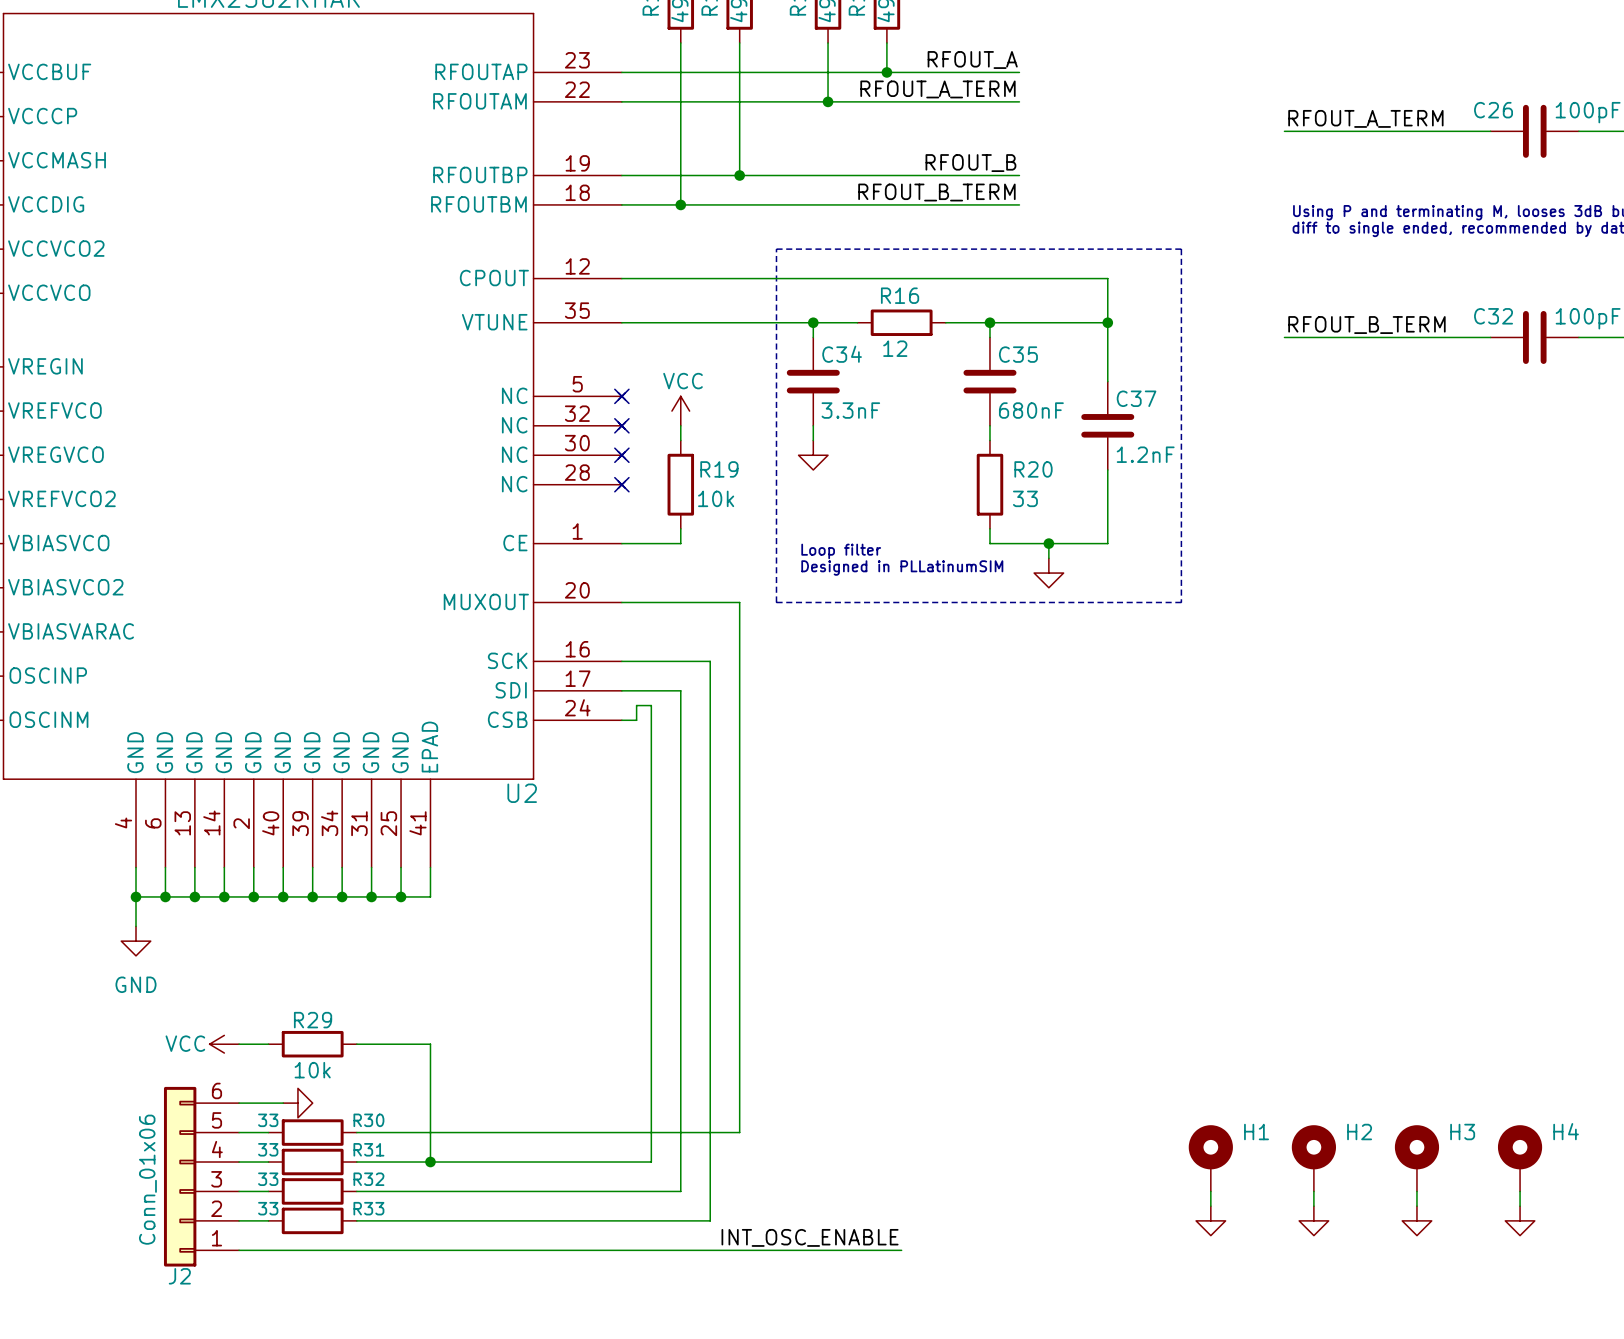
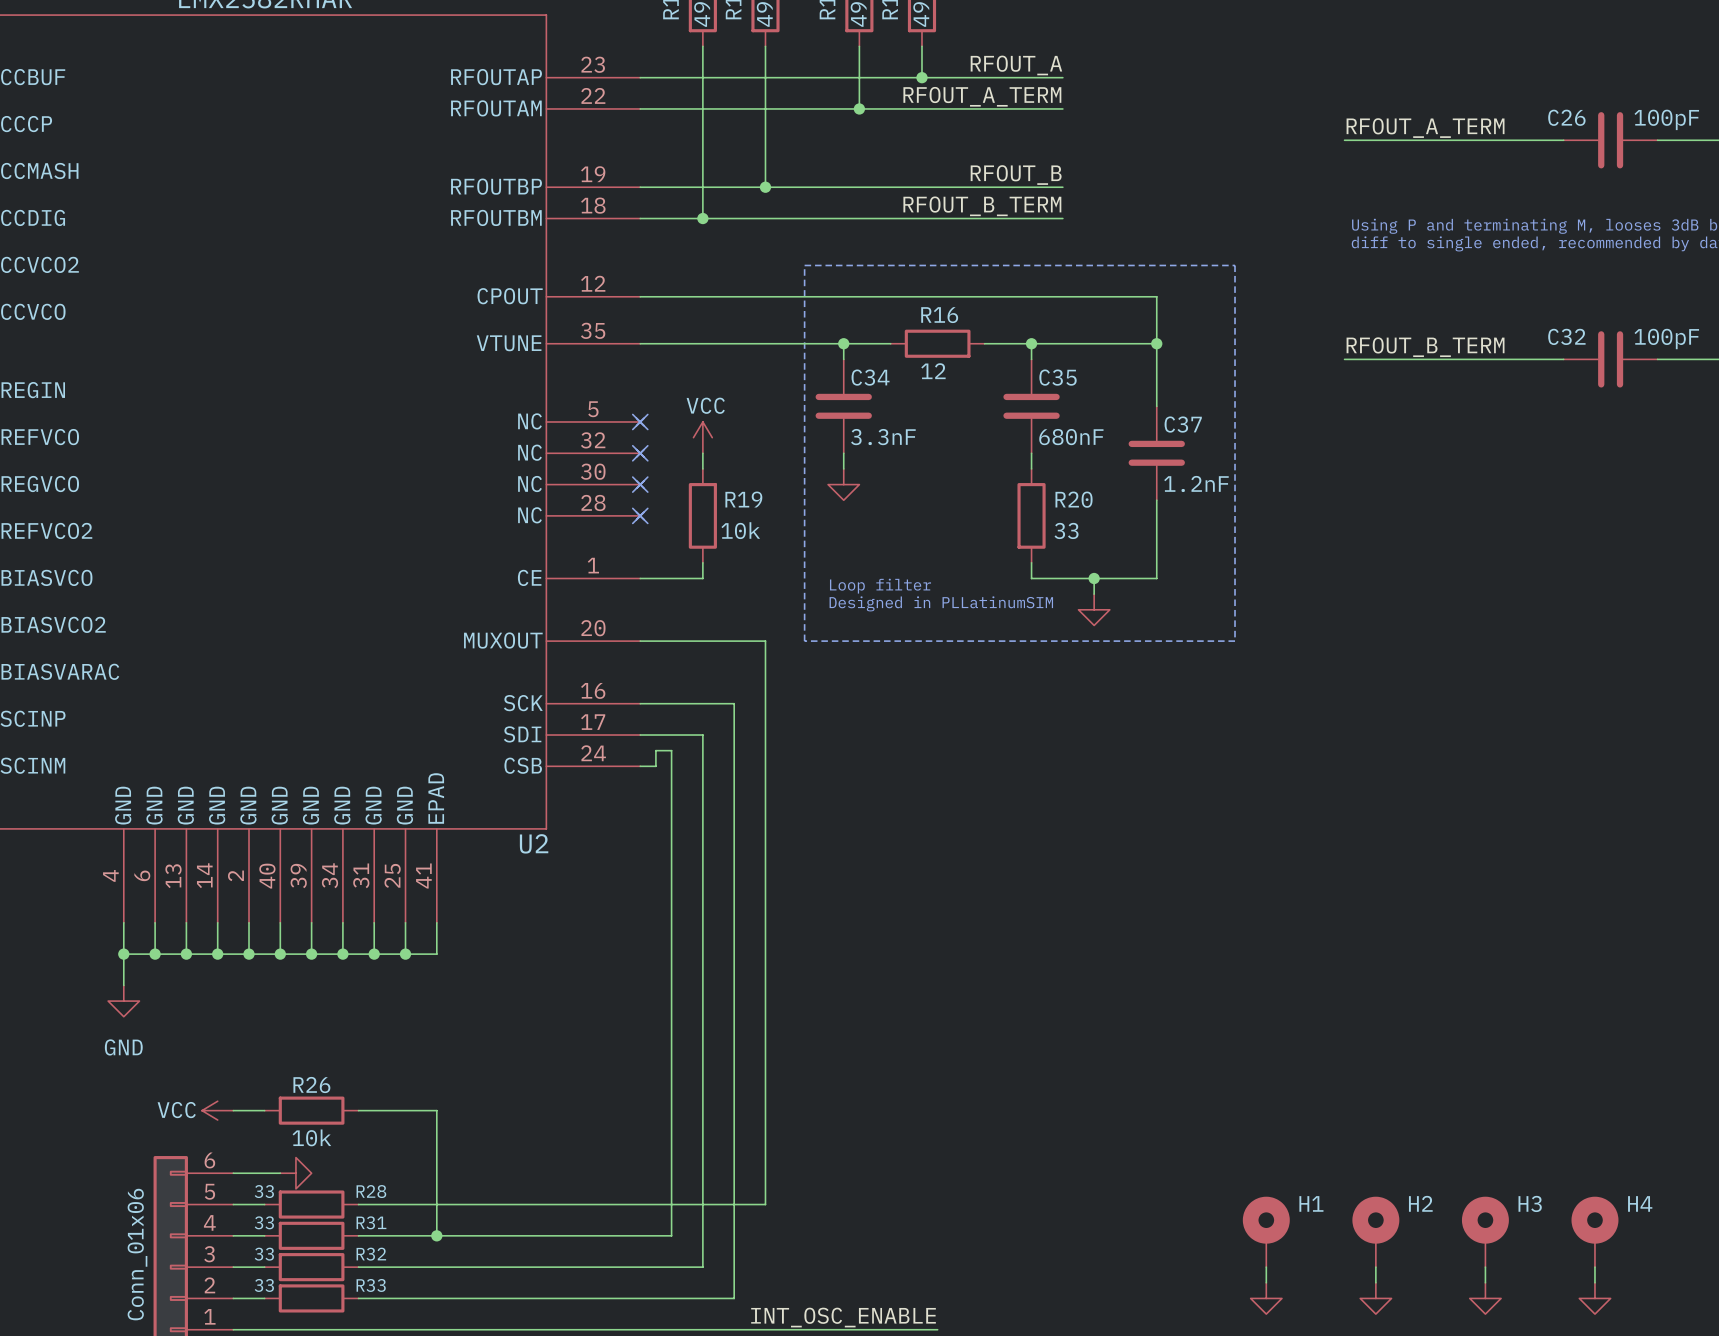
R29 name: R29 (313, 1020) -> R26 (311, 1085)
R30 name: R30 (368, 1120) -> R28 (371, 1191)

